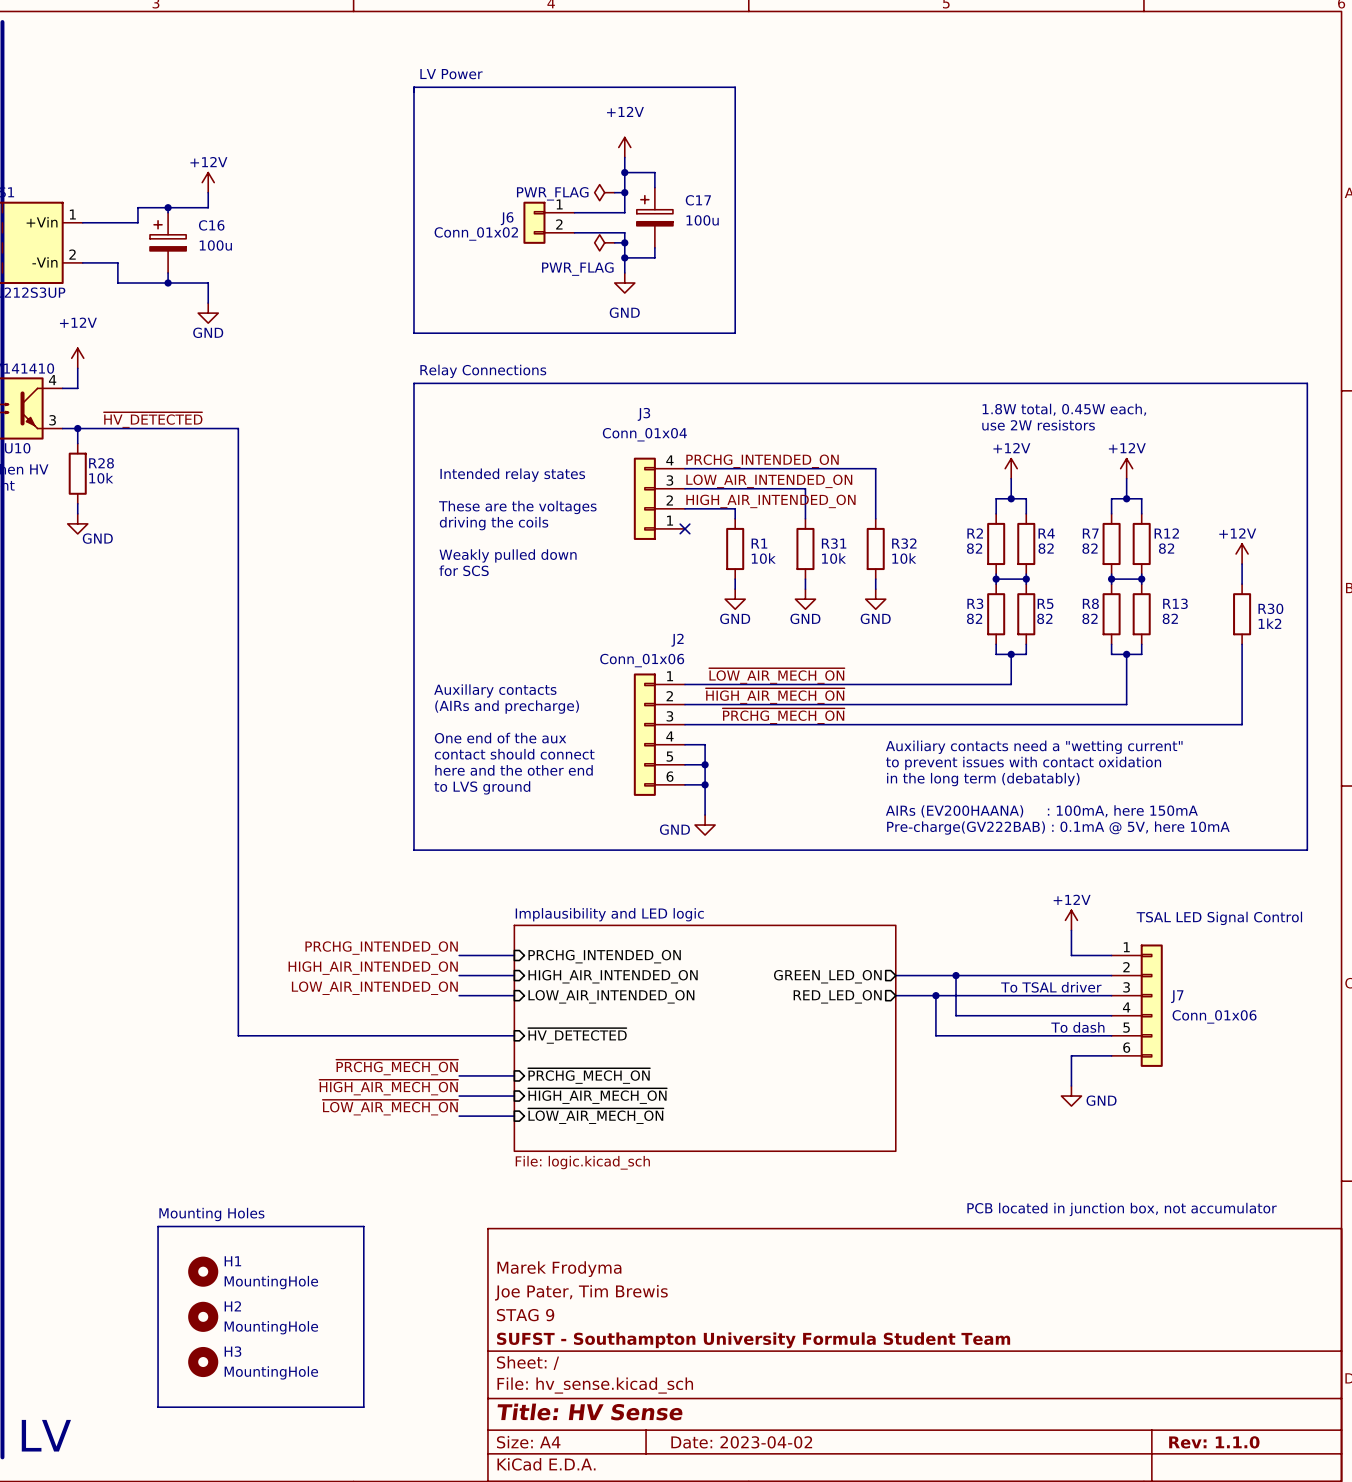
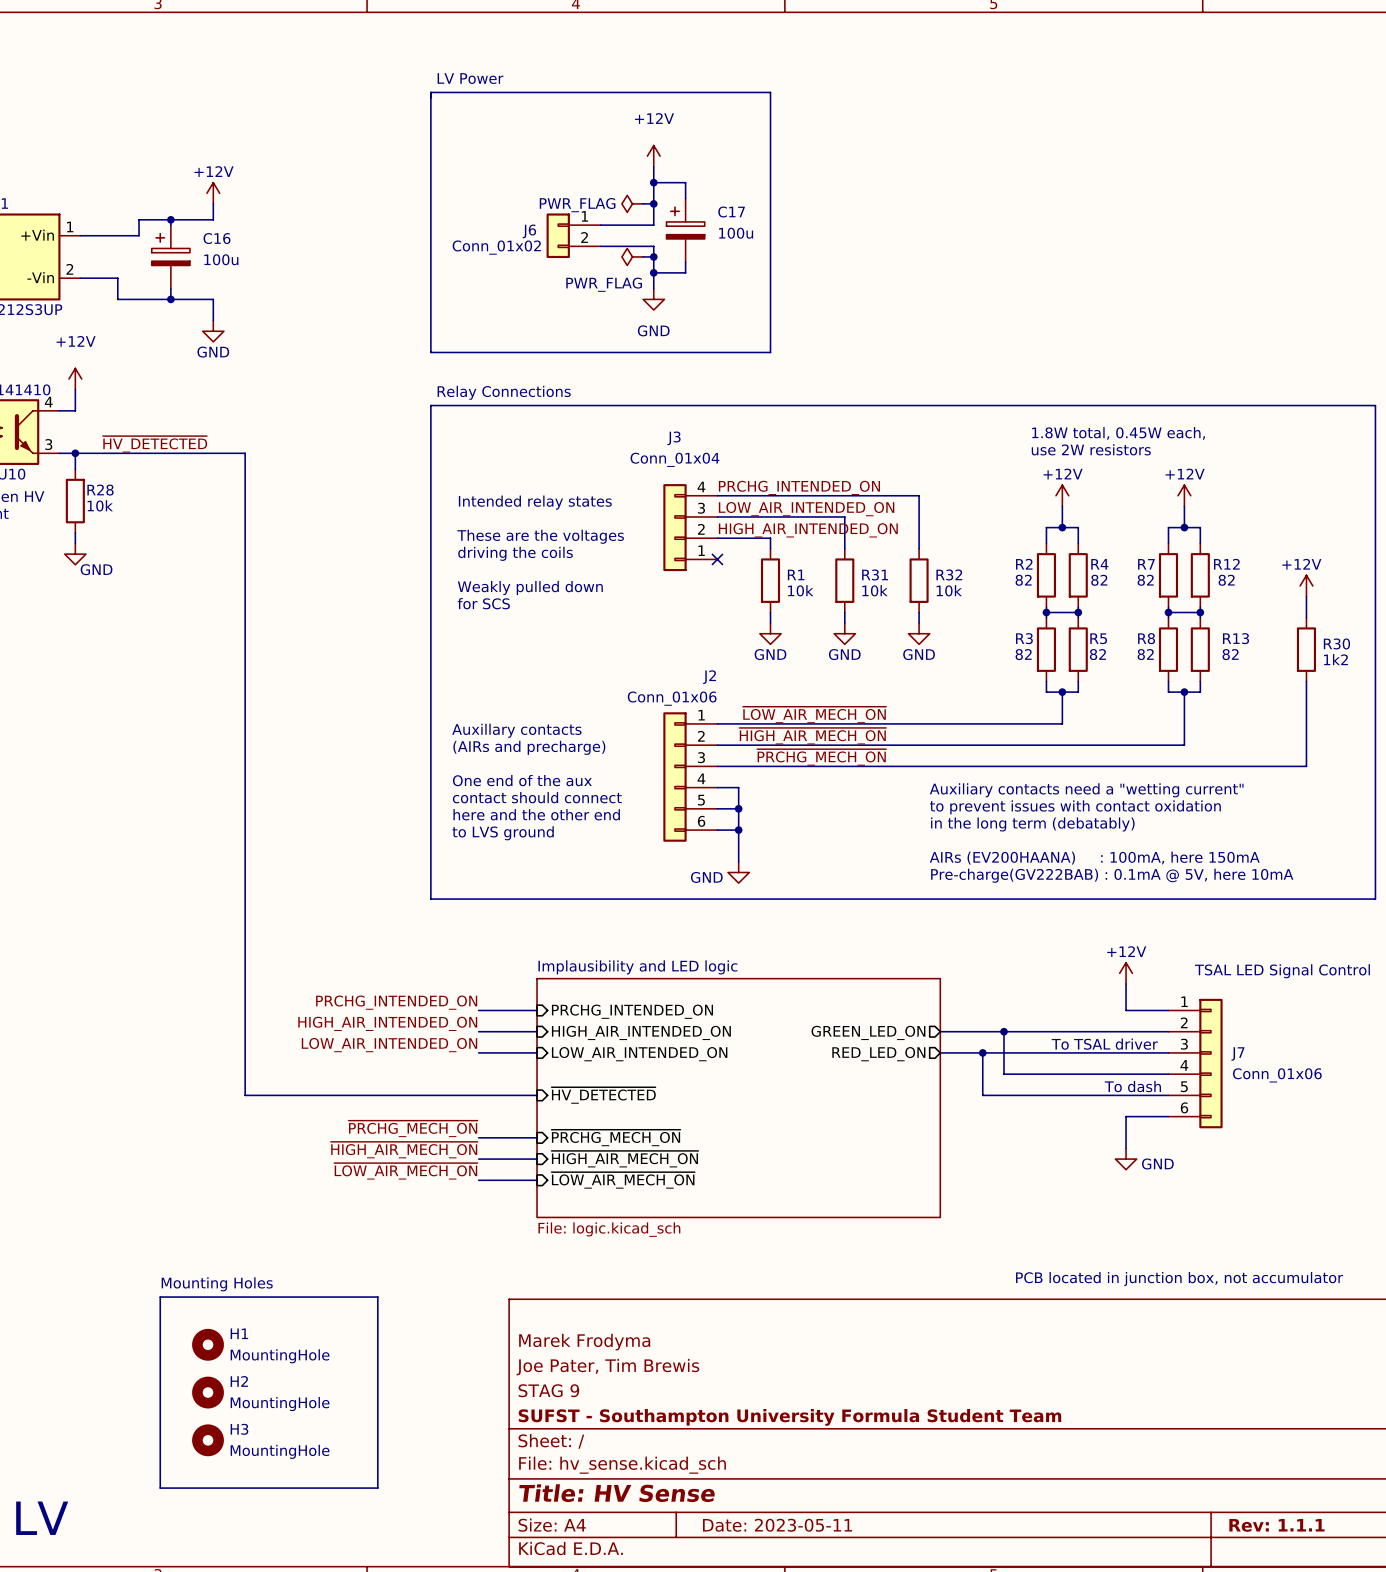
title block: Date: 2023-04-02 (741, 1442) -> Date: 2023-05-11 (777, 1525)
title block: Rev: 1.1.0 (1214, 1442) -> Rev: 1.1.1 (1276, 1525)

